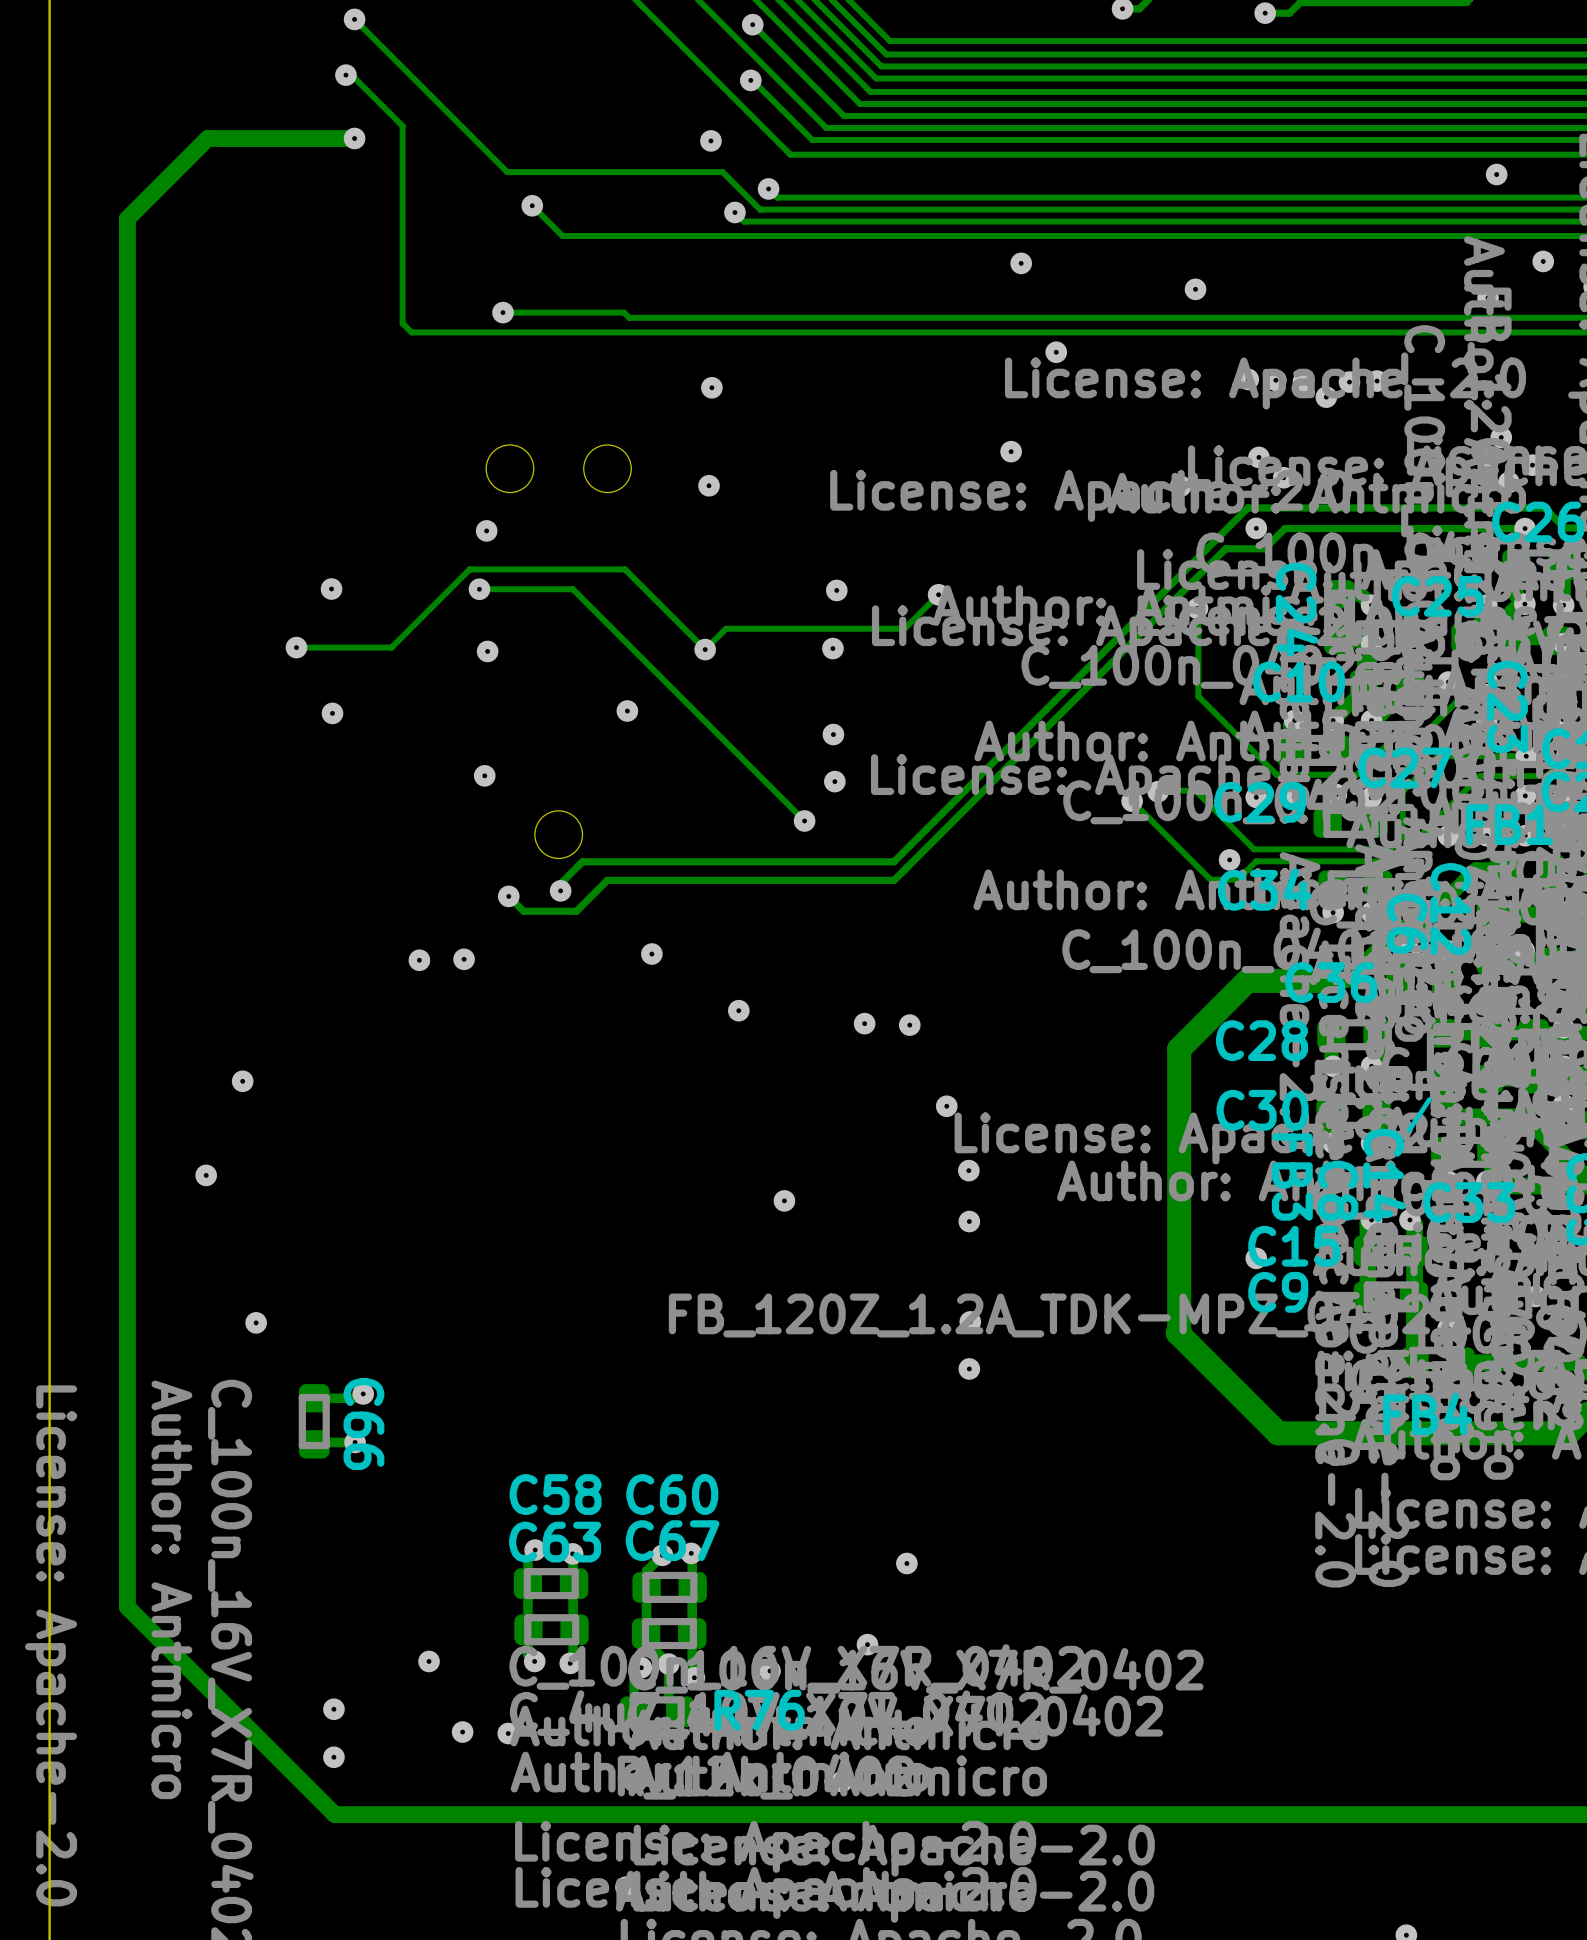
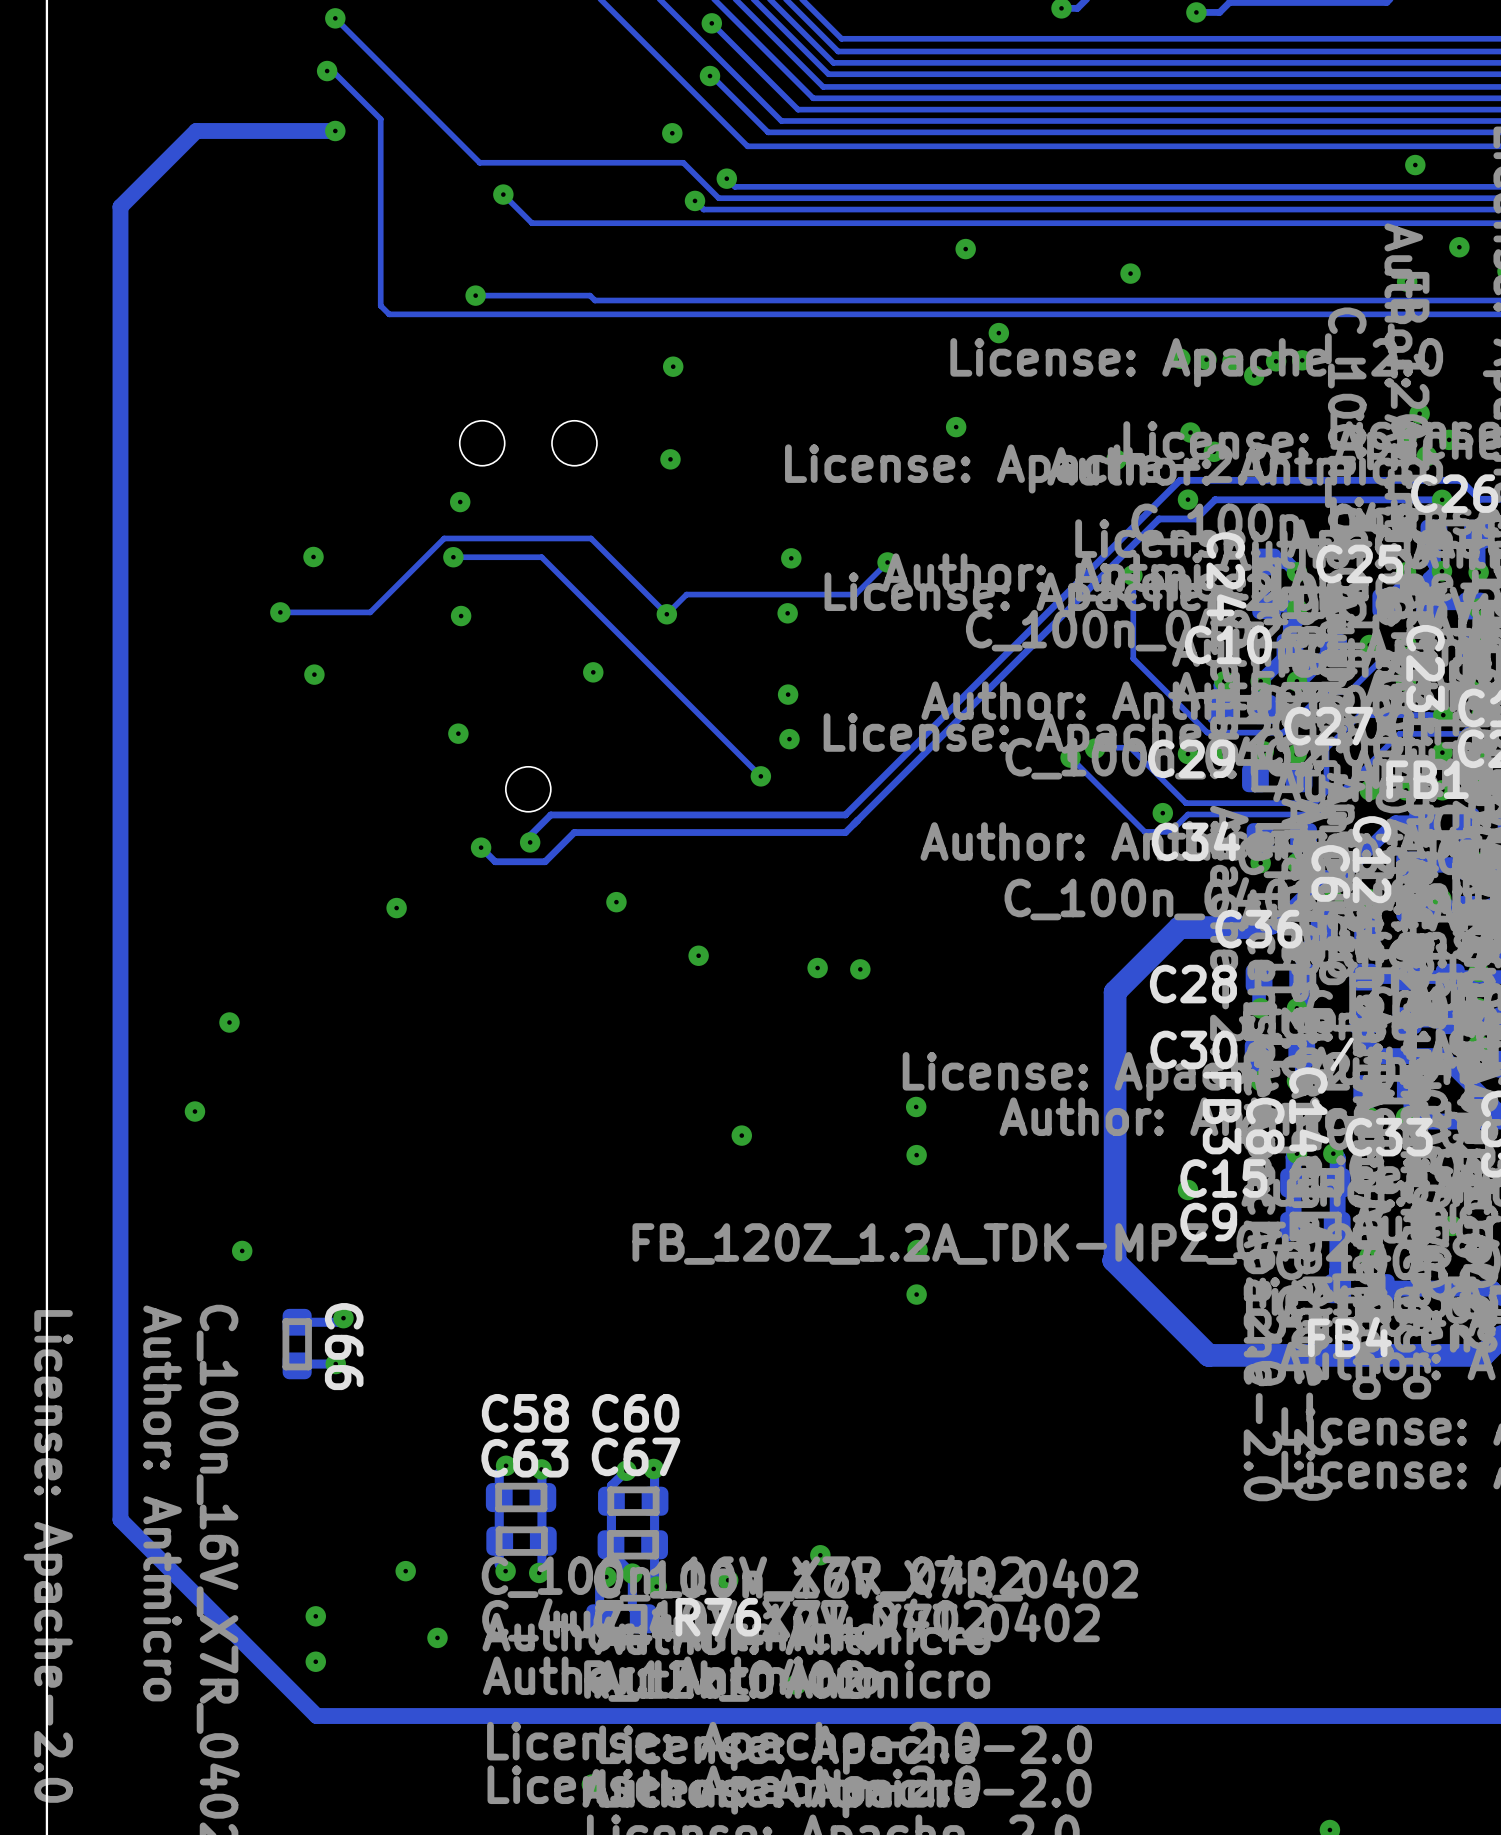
via: (464, 959) -> none
via: (946, 1106) -> none
via: (906, 1563) -> none
via: (508, 1733) -> none

